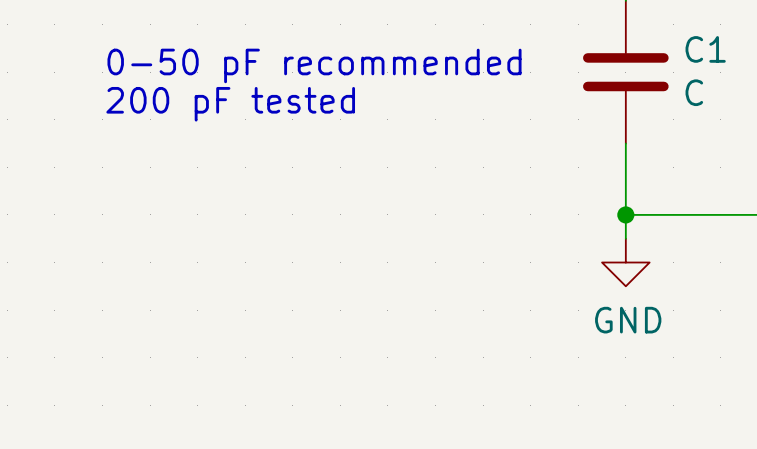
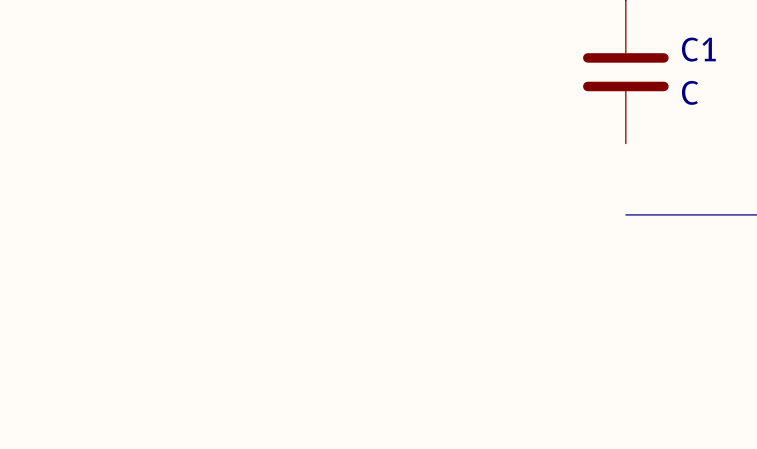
text: 0-50 pF recommended (314, 65) -> none
text: 200 pF tested (230, 104) -> none
wire: (625, 143) (625, 238) -> none
junction: (625, 214) -> none
power symbol: GND (625, 262) -> none

